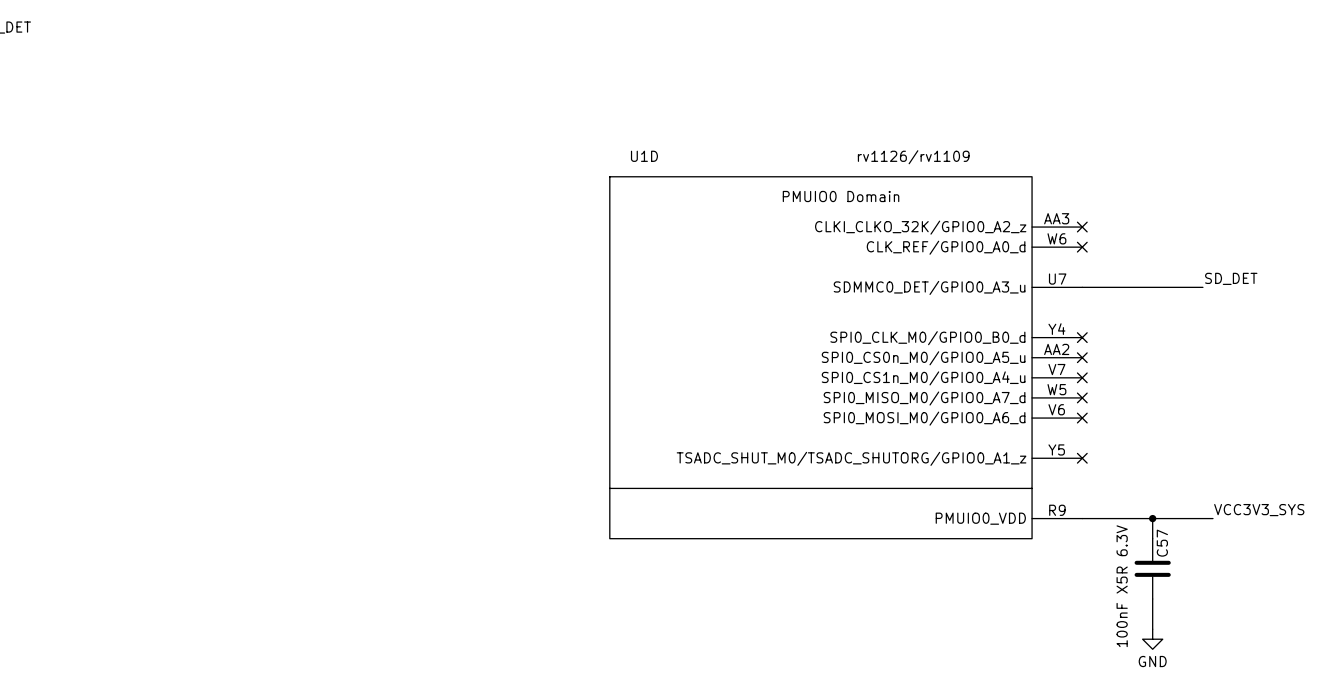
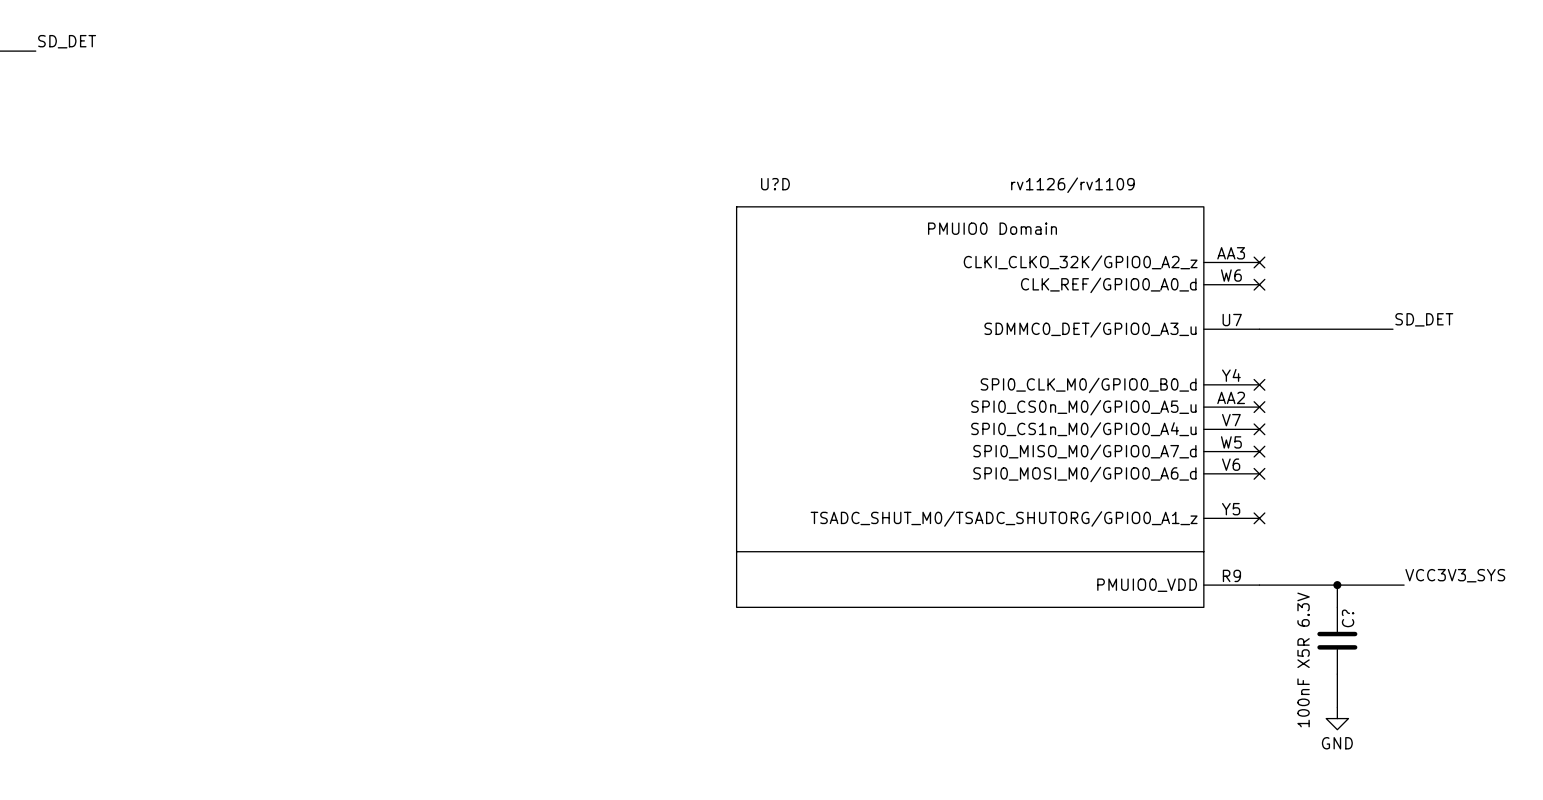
U1D name: U1D (644, 156) -> U?D (775, 184)
C57 name: C57 (1162, 543) -> C? (1348, 618)

